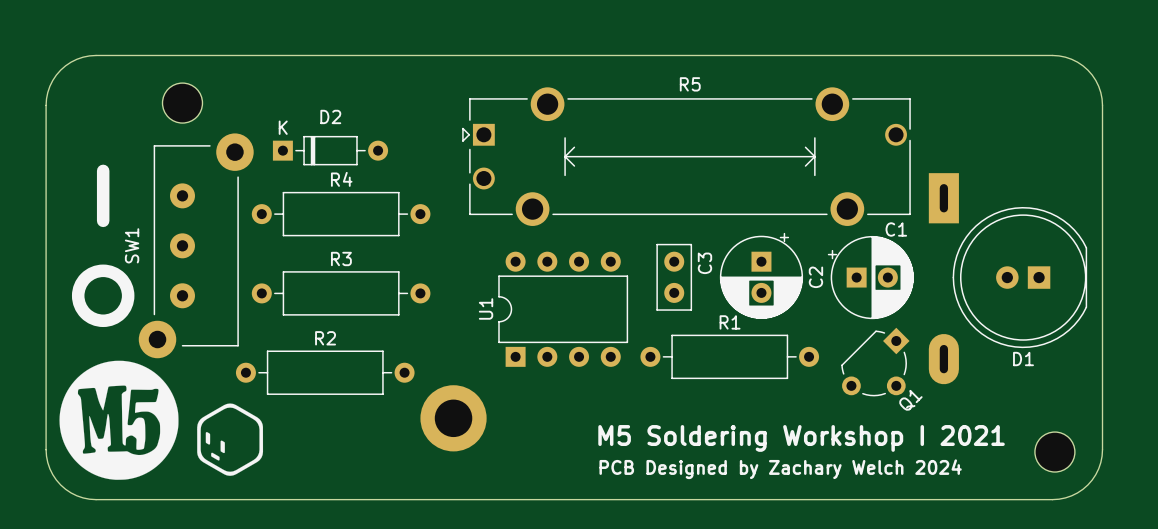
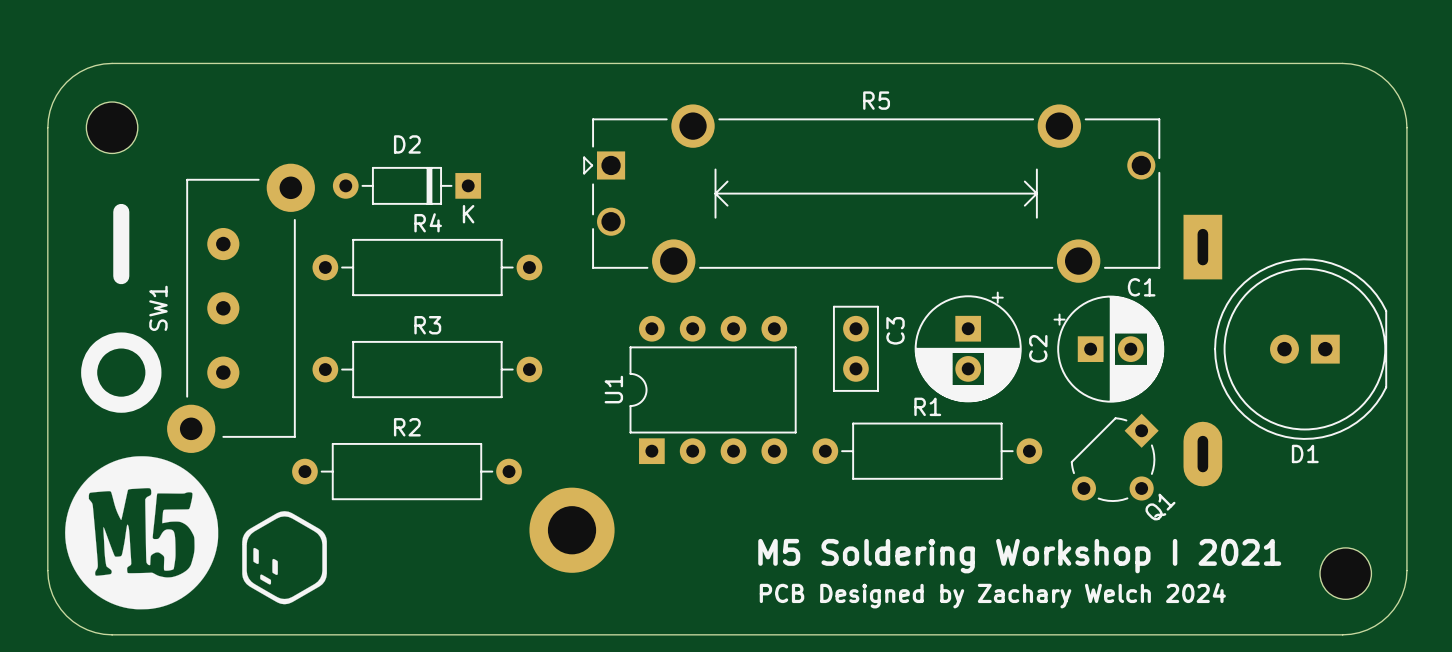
part position: (182, 103) -> (112, 127)
D2 rotation: 0° (330, 150) -> 180° (406, 185)

